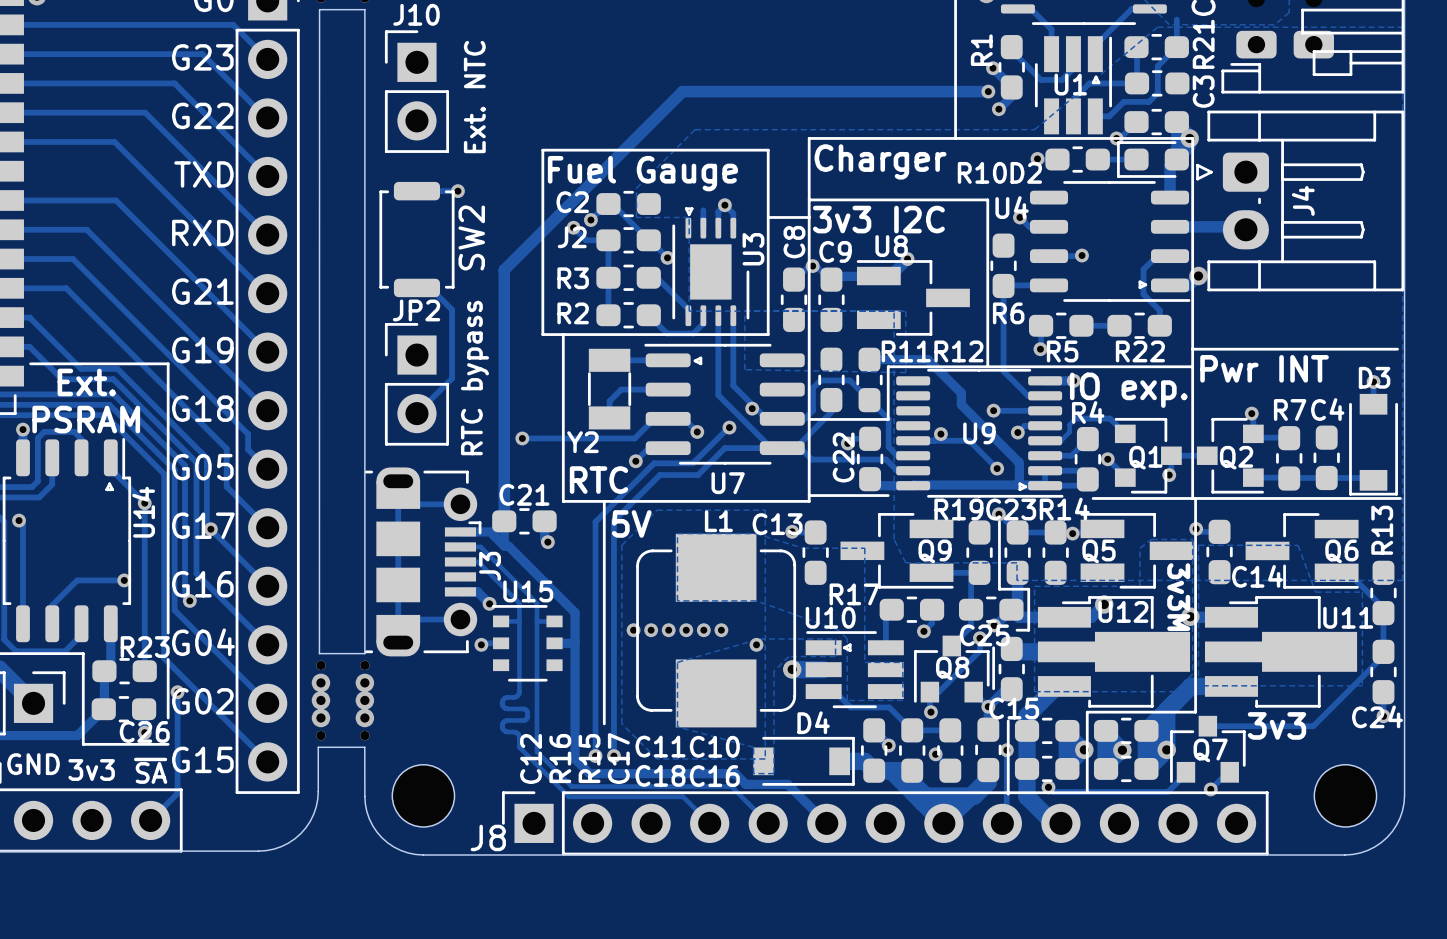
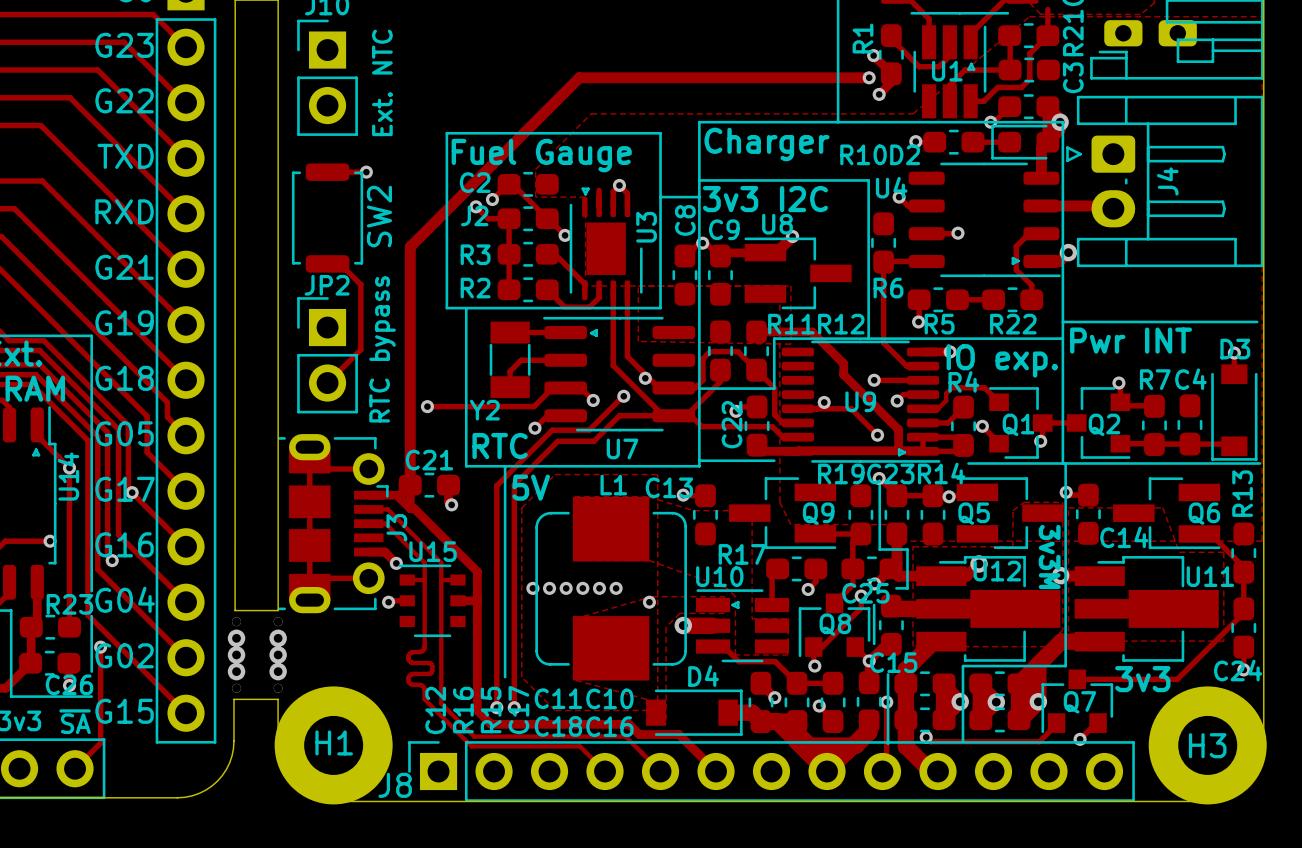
part: (423, 795) -> none
H1: none -> (333, 745)
part: (1345, 795) -> none
H3: none -> (1207, 745)

